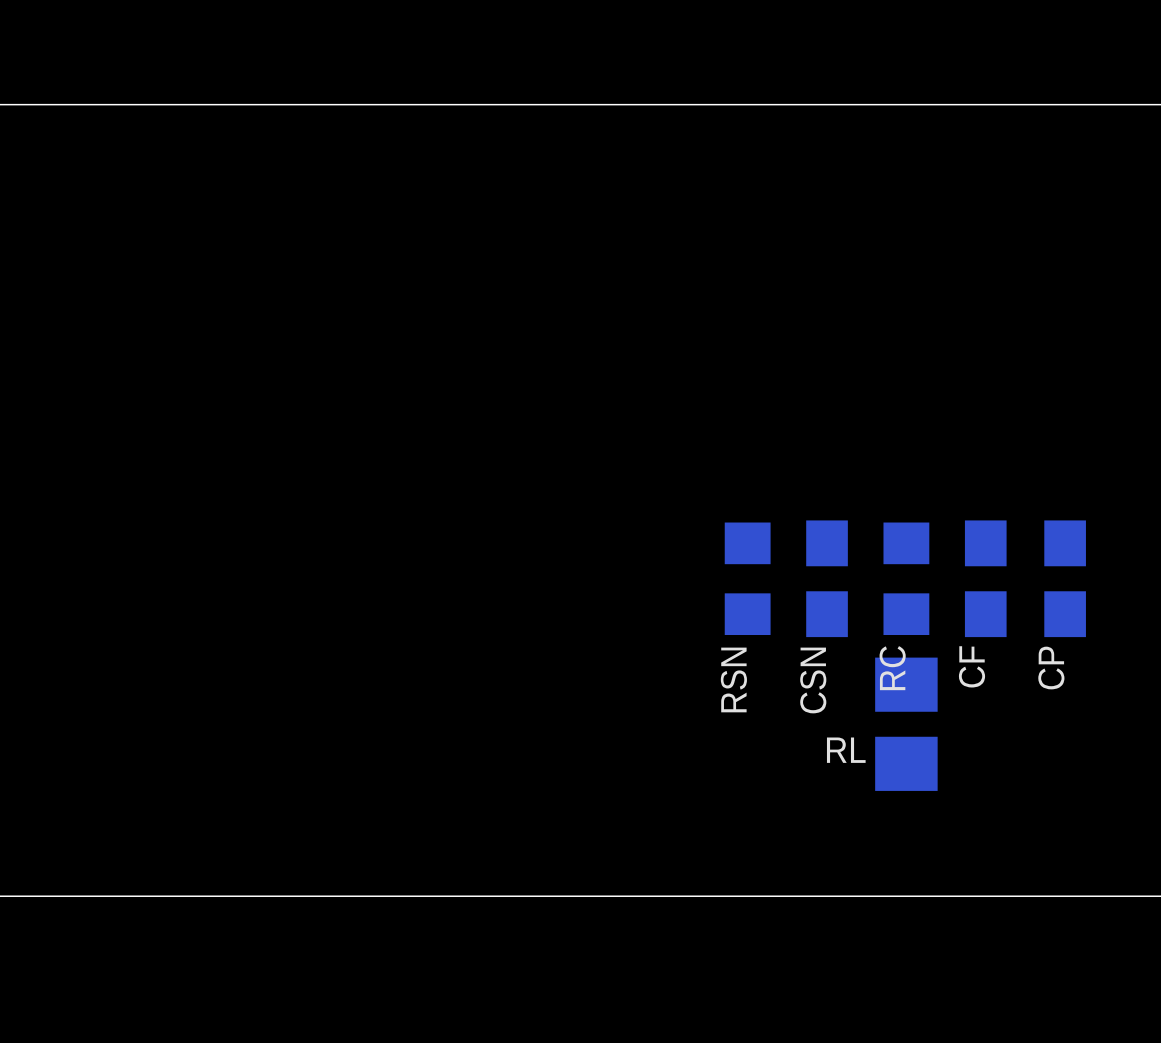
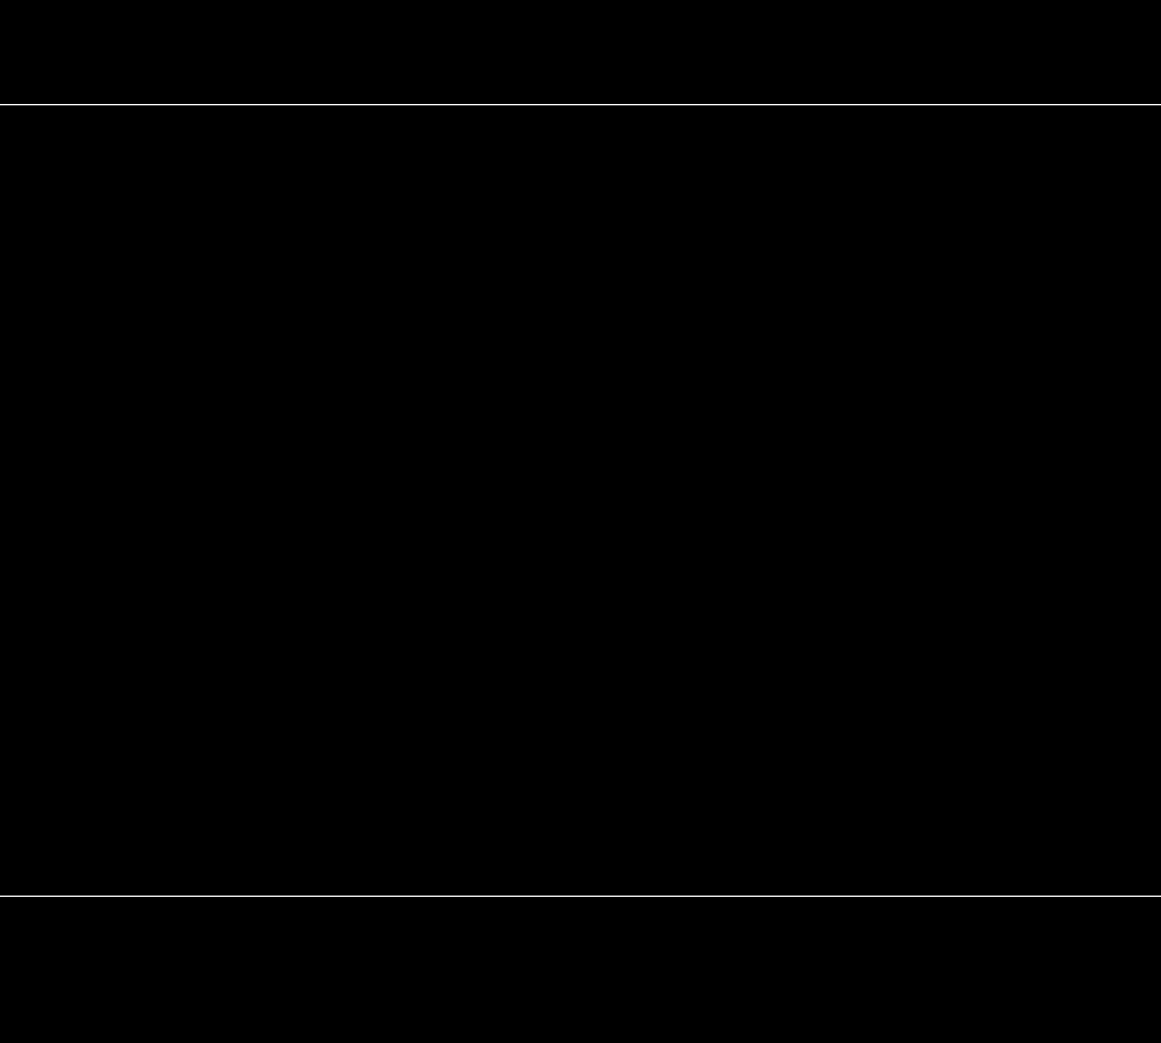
RSN: (747, 578) -> none
CSN: (827, 578) -> none
RC: (906, 578) -> none
CF: (985, 578) -> none
CP: (1065, 578) -> none
RL: (906, 724) -> none

